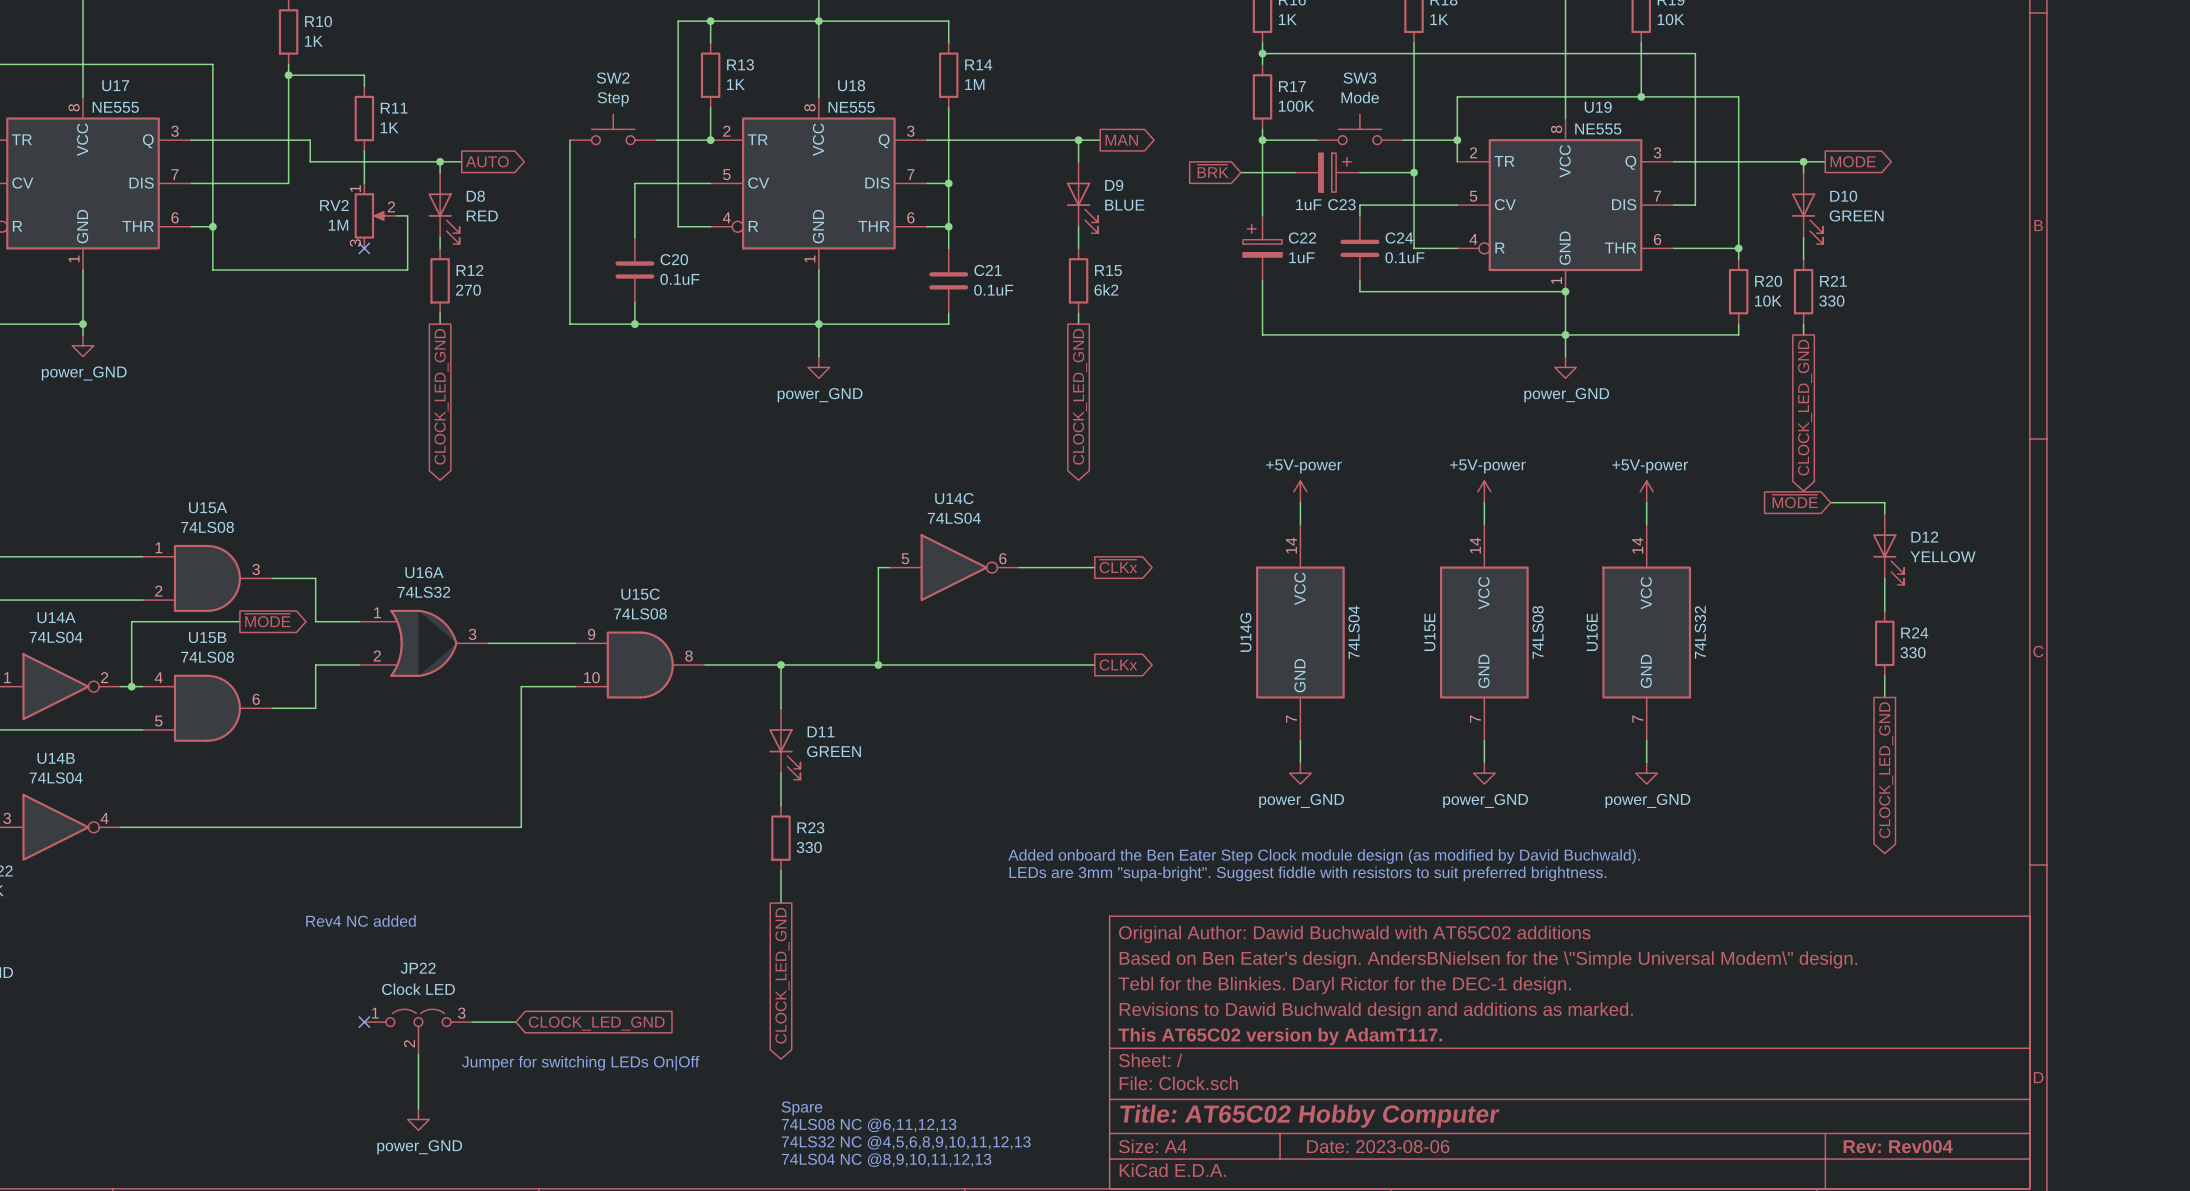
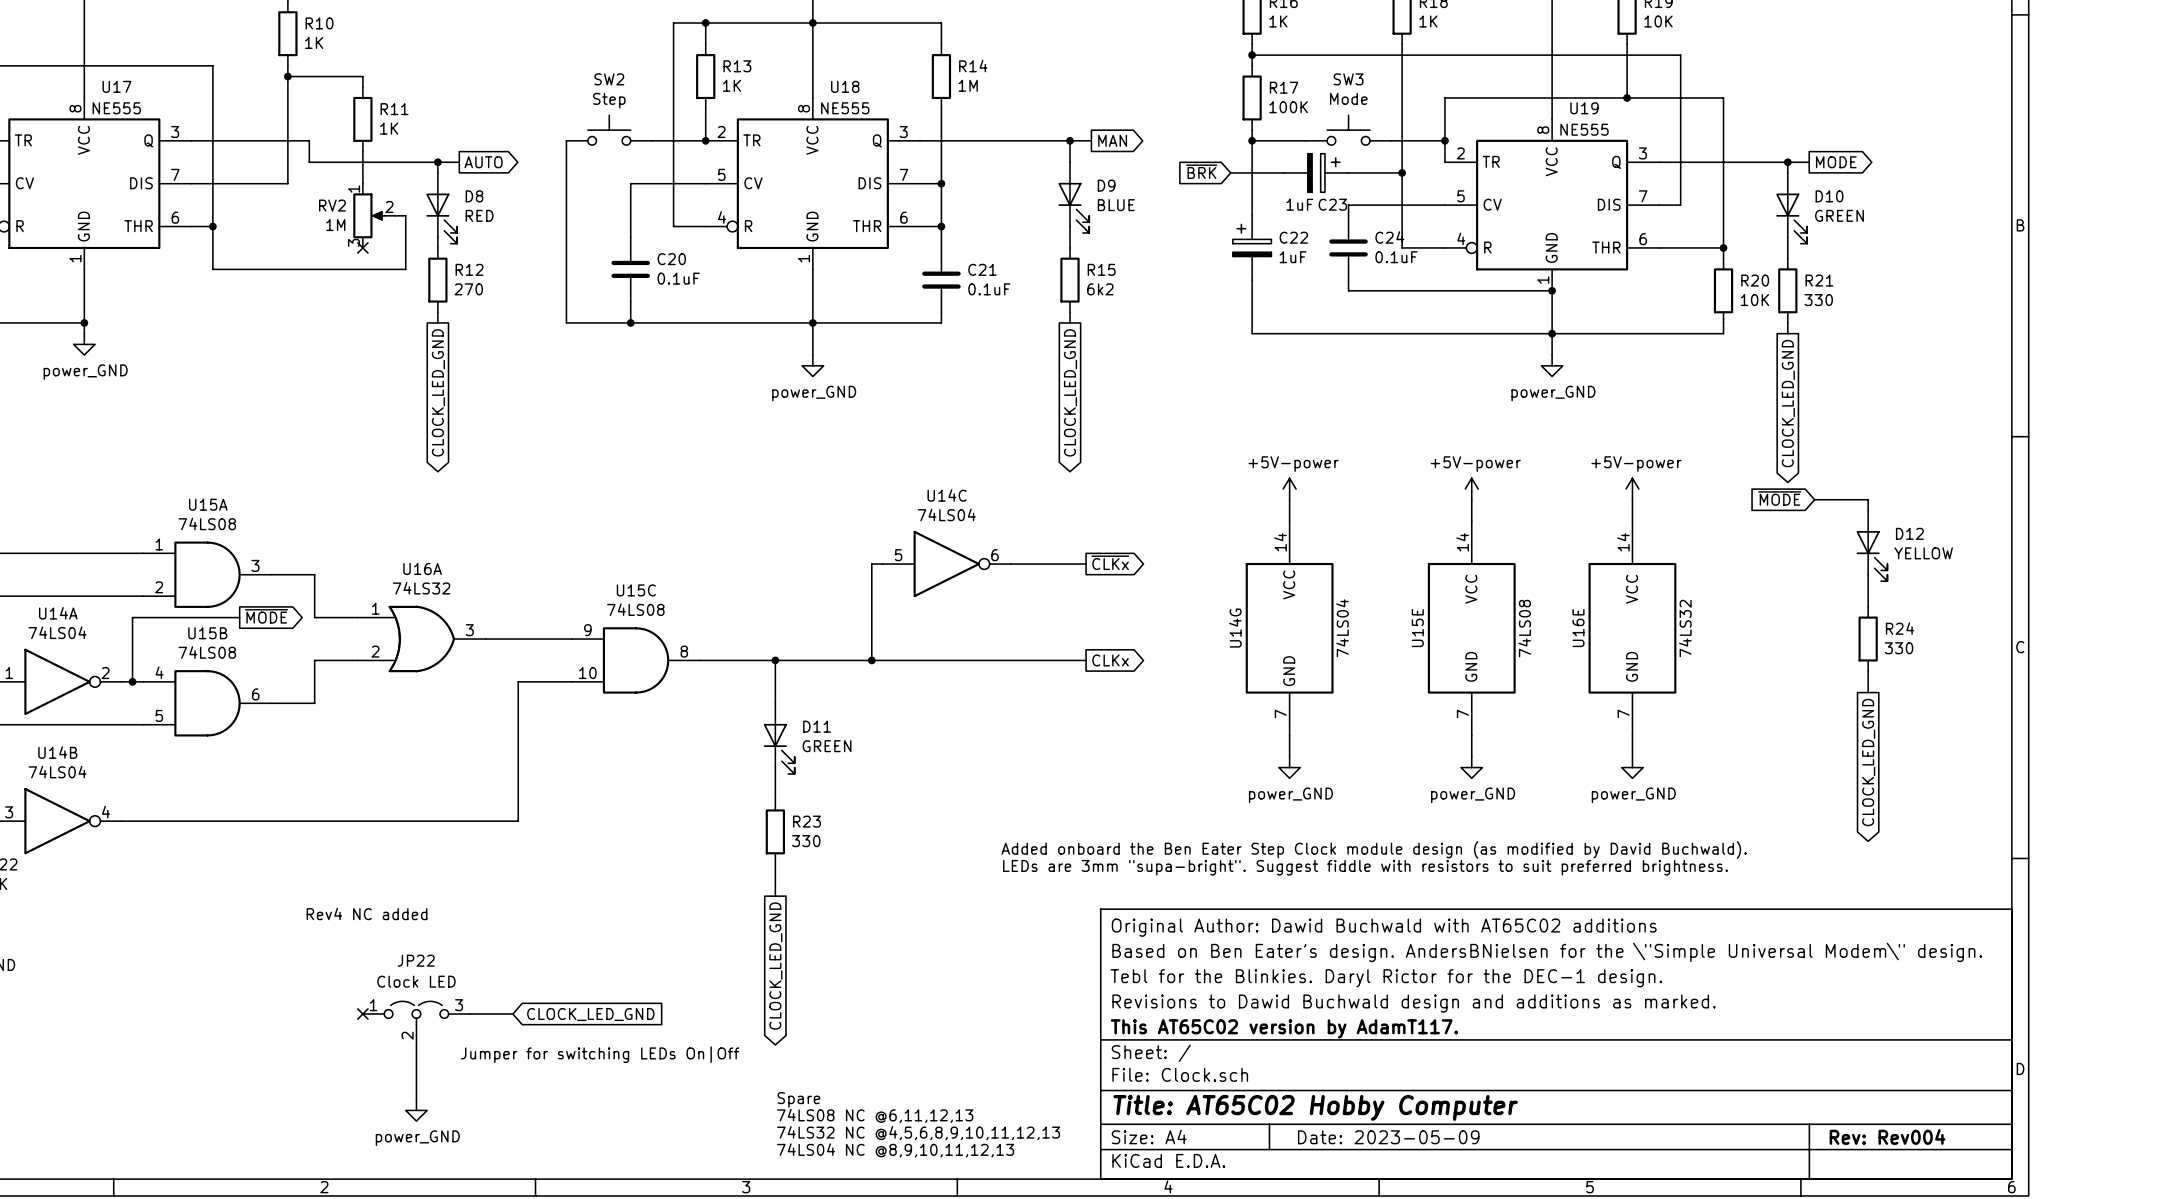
title block: Date: 2023-08-06 (1378, 1146) -> Date: 2023-05-09 (1388, 1137)

